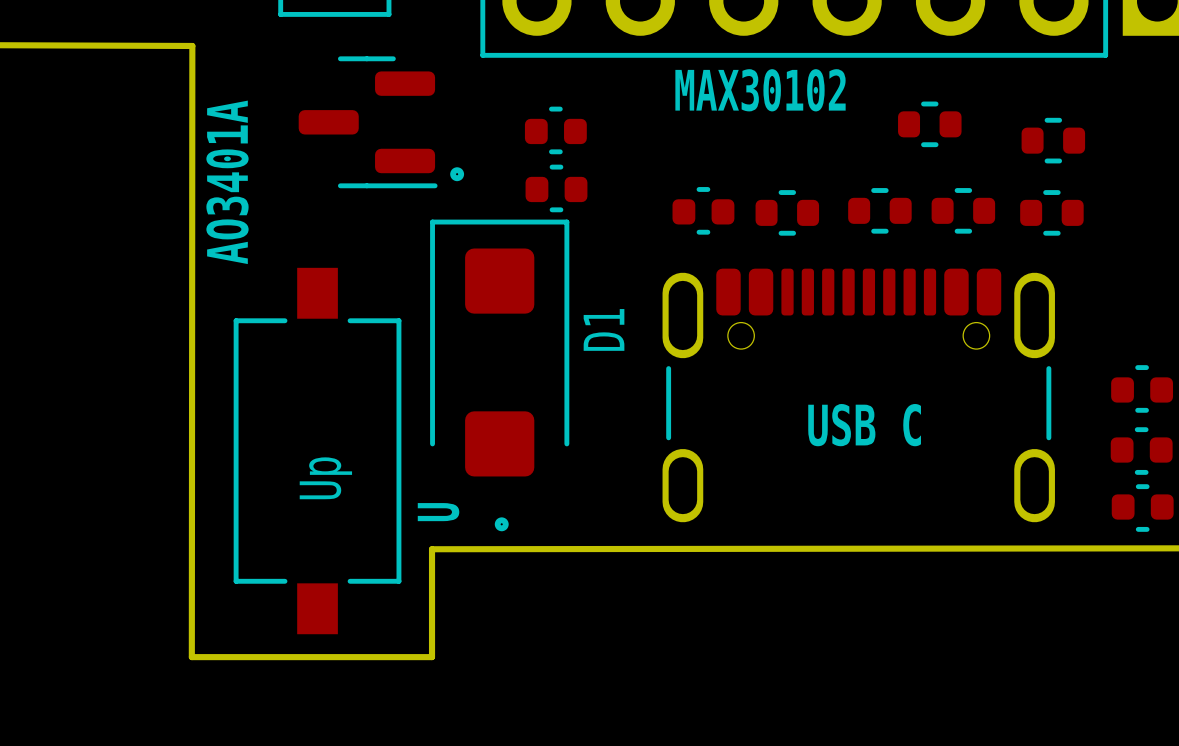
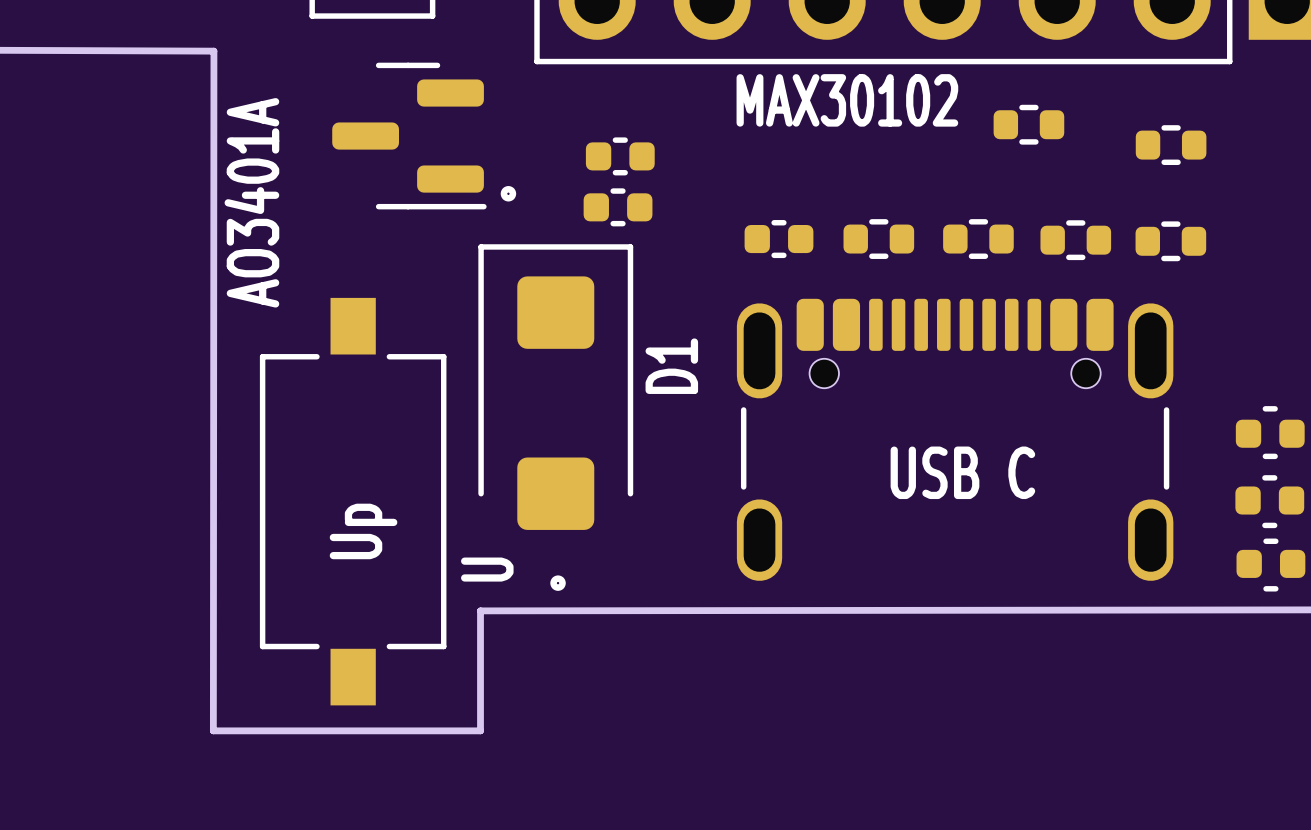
part footprint: [898, 101, 962, 148] -> [993, 104, 1065, 145]
part footprint: [524, 106, 587, 155] -> [585, 137, 655, 176]
part footprint: [1021, 117, 1086, 164] -> [1135, 125, 1207, 166]
part footprint: [525, 164, 588, 213] -> [583, 188, 653, 227]
part footprint: [672, 187, 735, 235] -> [744, 220, 814, 259]
part footprint: [848, 188, 912, 234] -> [943, 219, 1014, 259]
part footprint: [931, 188, 996, 234] -> [1040, 220, 1112, 261]
part footprint: [755, 190, 820, 236] -> [843, 219, 915, 259]
part footprint: [1020, 190, 1084, 236] -> [1135, 221, 1207, 262]

